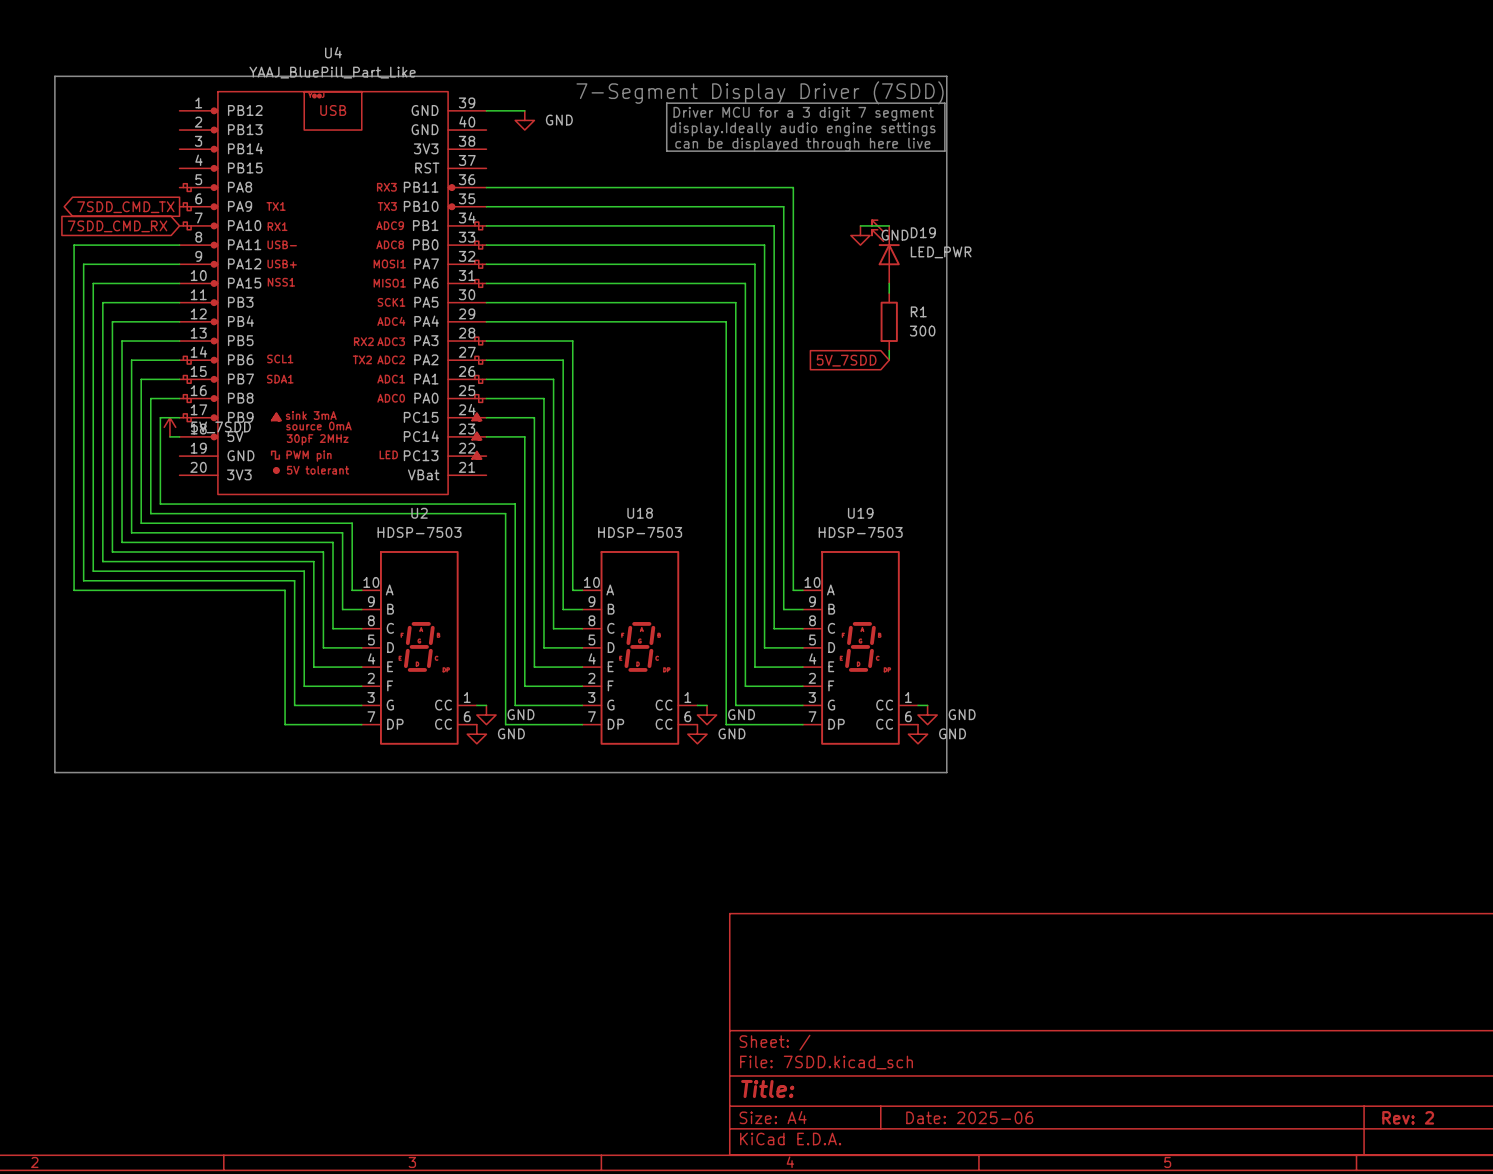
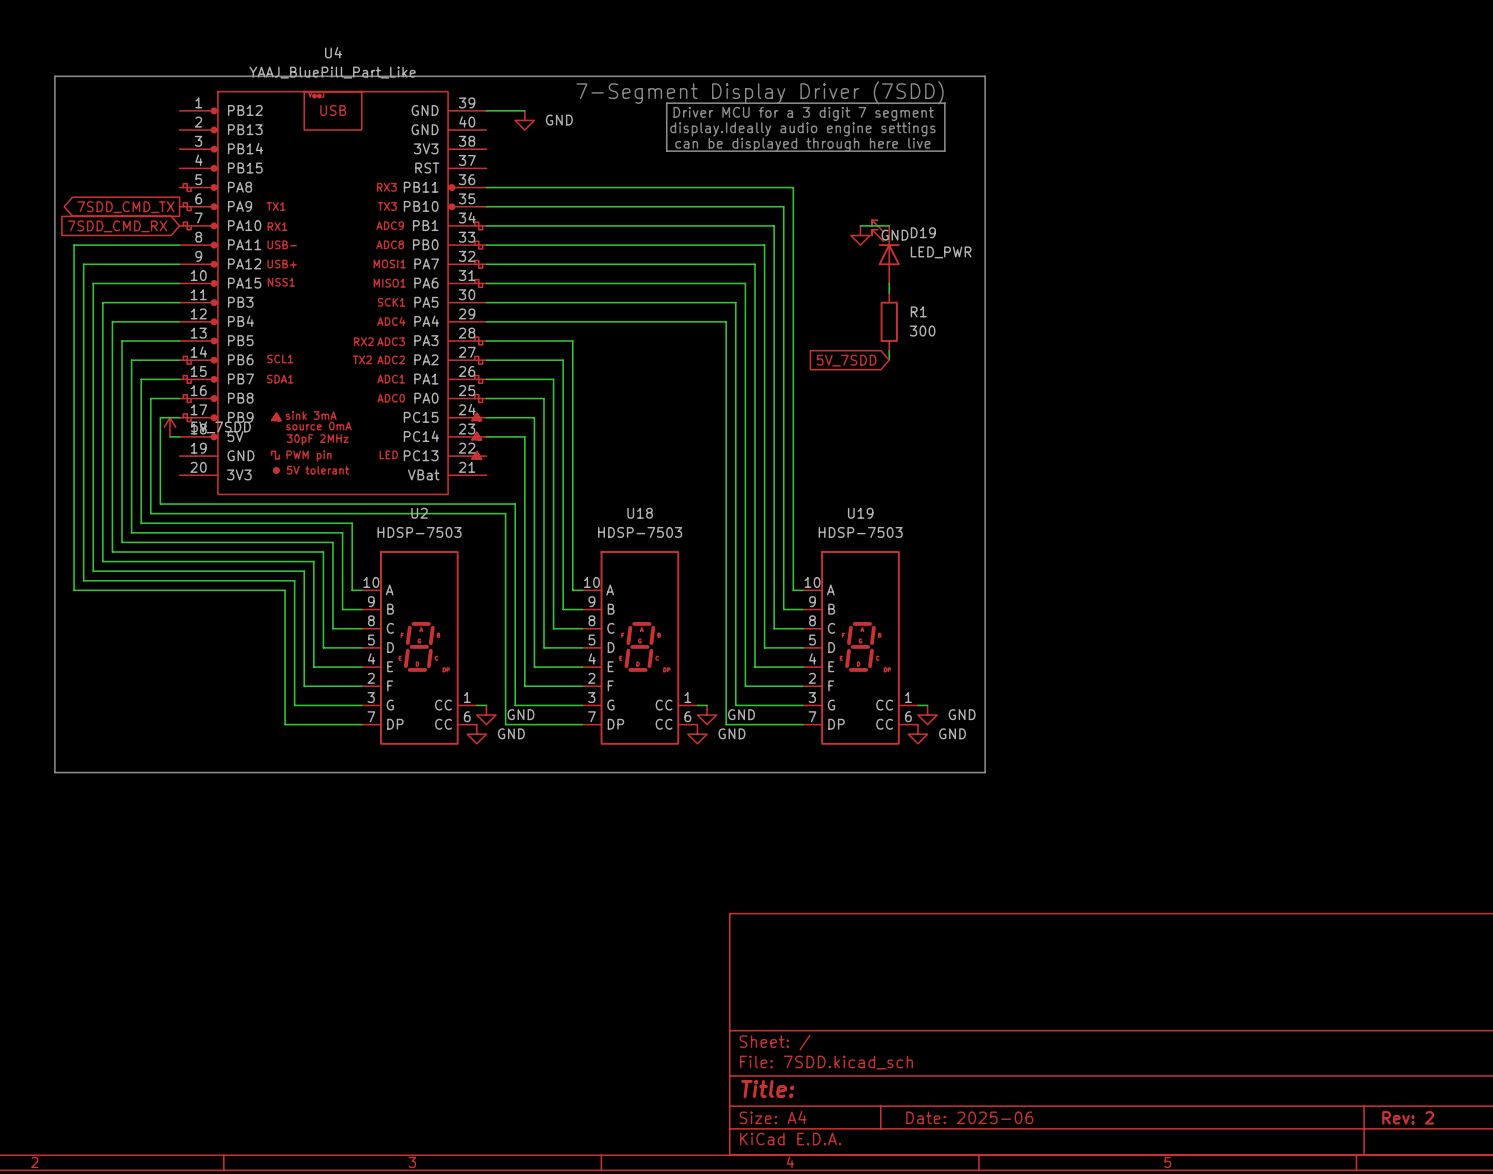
line: (946, 76) (946, 772) -> (946, 76) (985, 76) (985, 772) (946, 772)

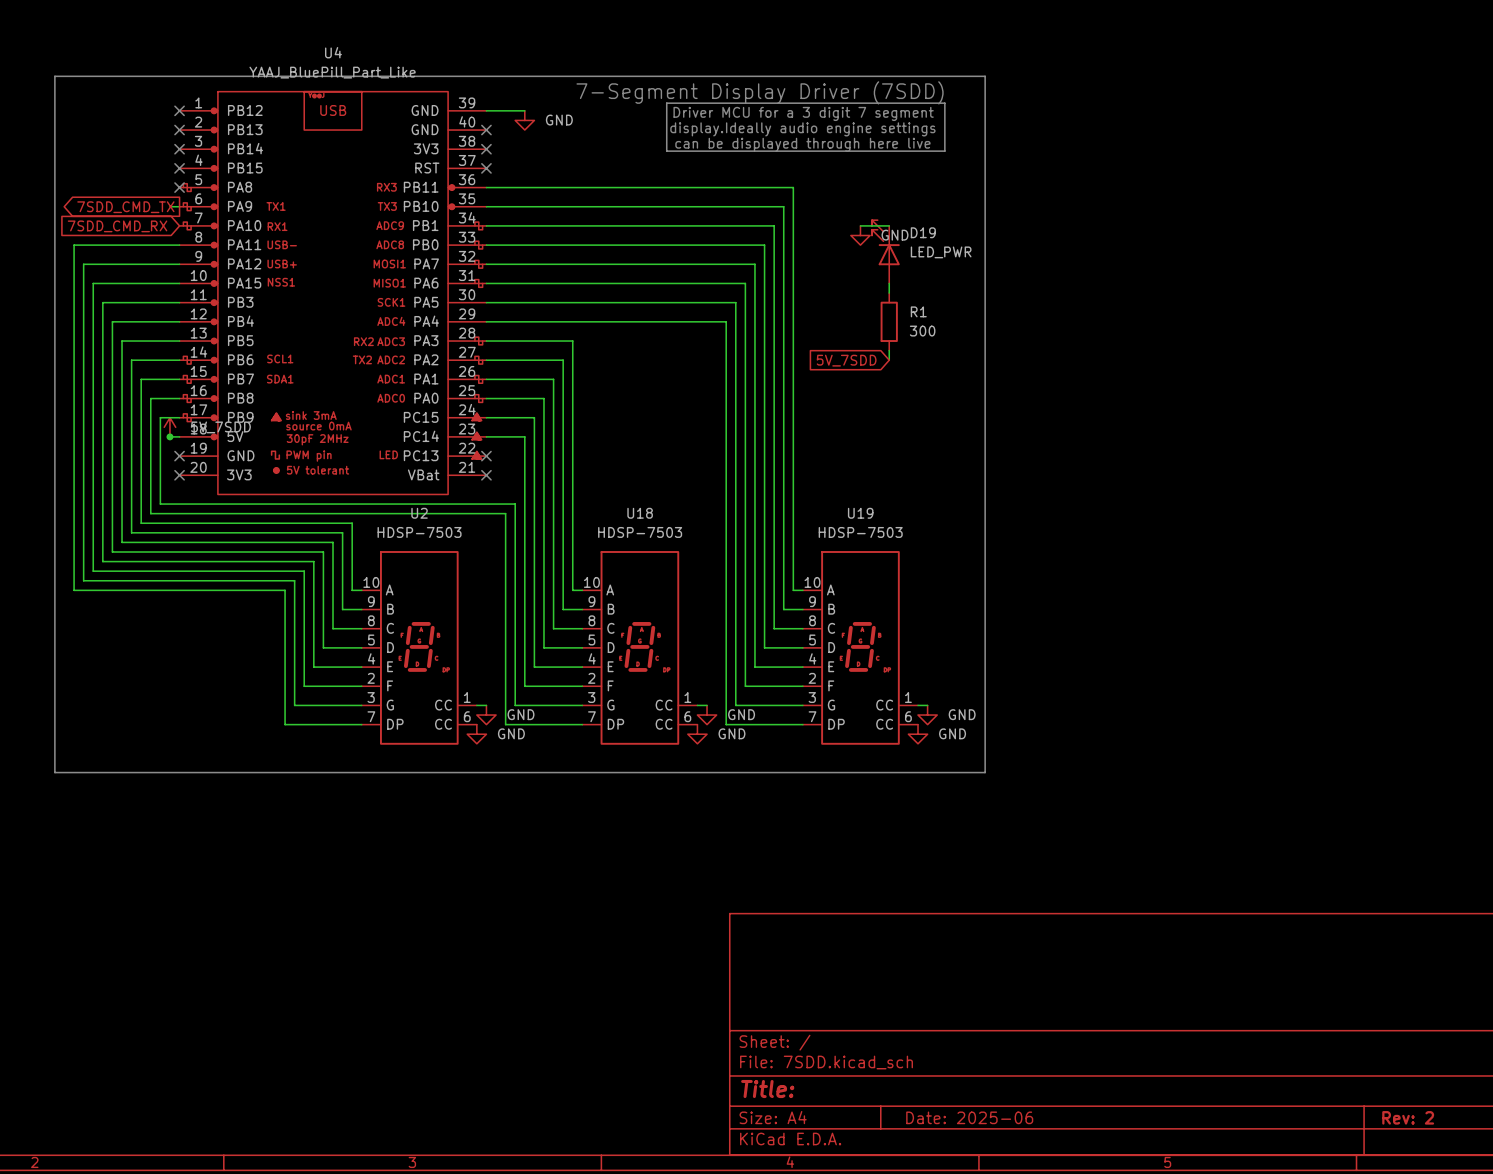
no-connect mark: none -> (179, 110)
no-connect mark: none -> (179, 130)
no-connect mark: none -> (486, 130)
no-connect mark: none -> (179, 149)
no-connect mark: none -> (486, 149)
no-connect mark: none -> (179, 168)
no-connect mark: none -> (486, 168)
no-connect mark: none -> (179, 187)
wire: none -> (169, 206) (179, 206)
junction: none -> (169, 436)
no-connect mark: none -> (179, 456)
no-connect mark: none -> (486, 456)
no-connect mark: none -> (179, 475)
no-connect mark: none -> (486, 475)

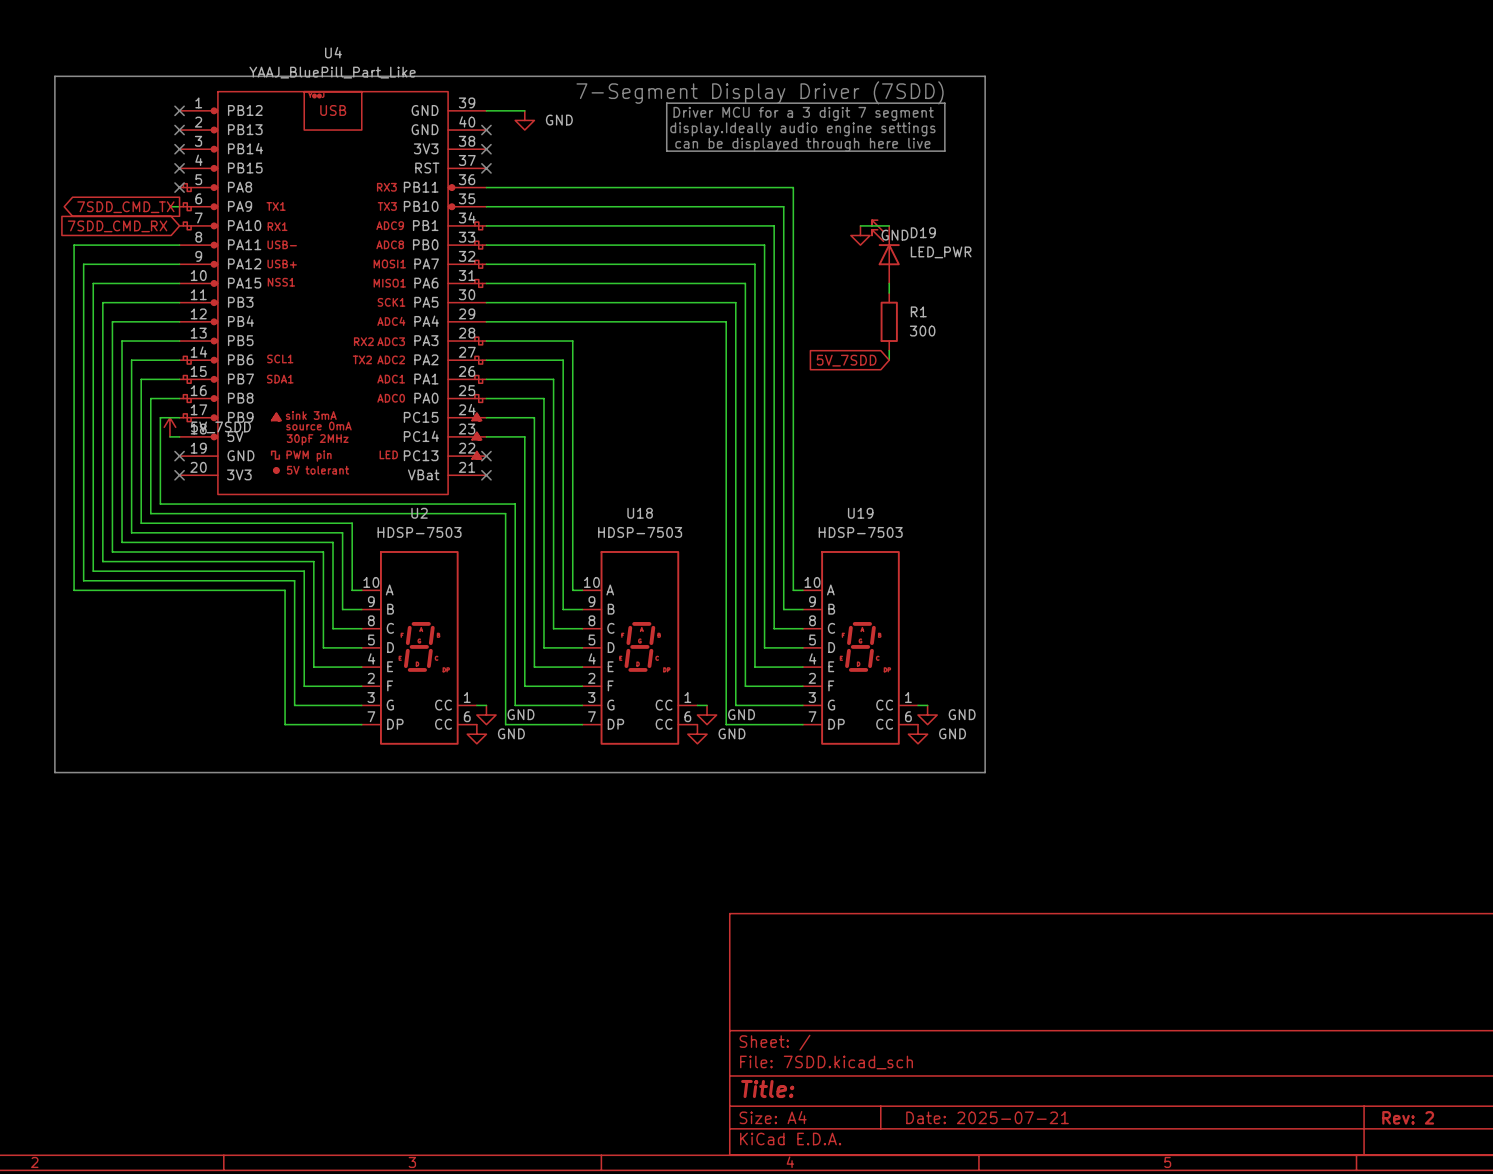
junction: (169, 436) -> none
title block: Date: 2025-06 (969, 1117) -> Date: 2025-07-21 (987, 1117)

